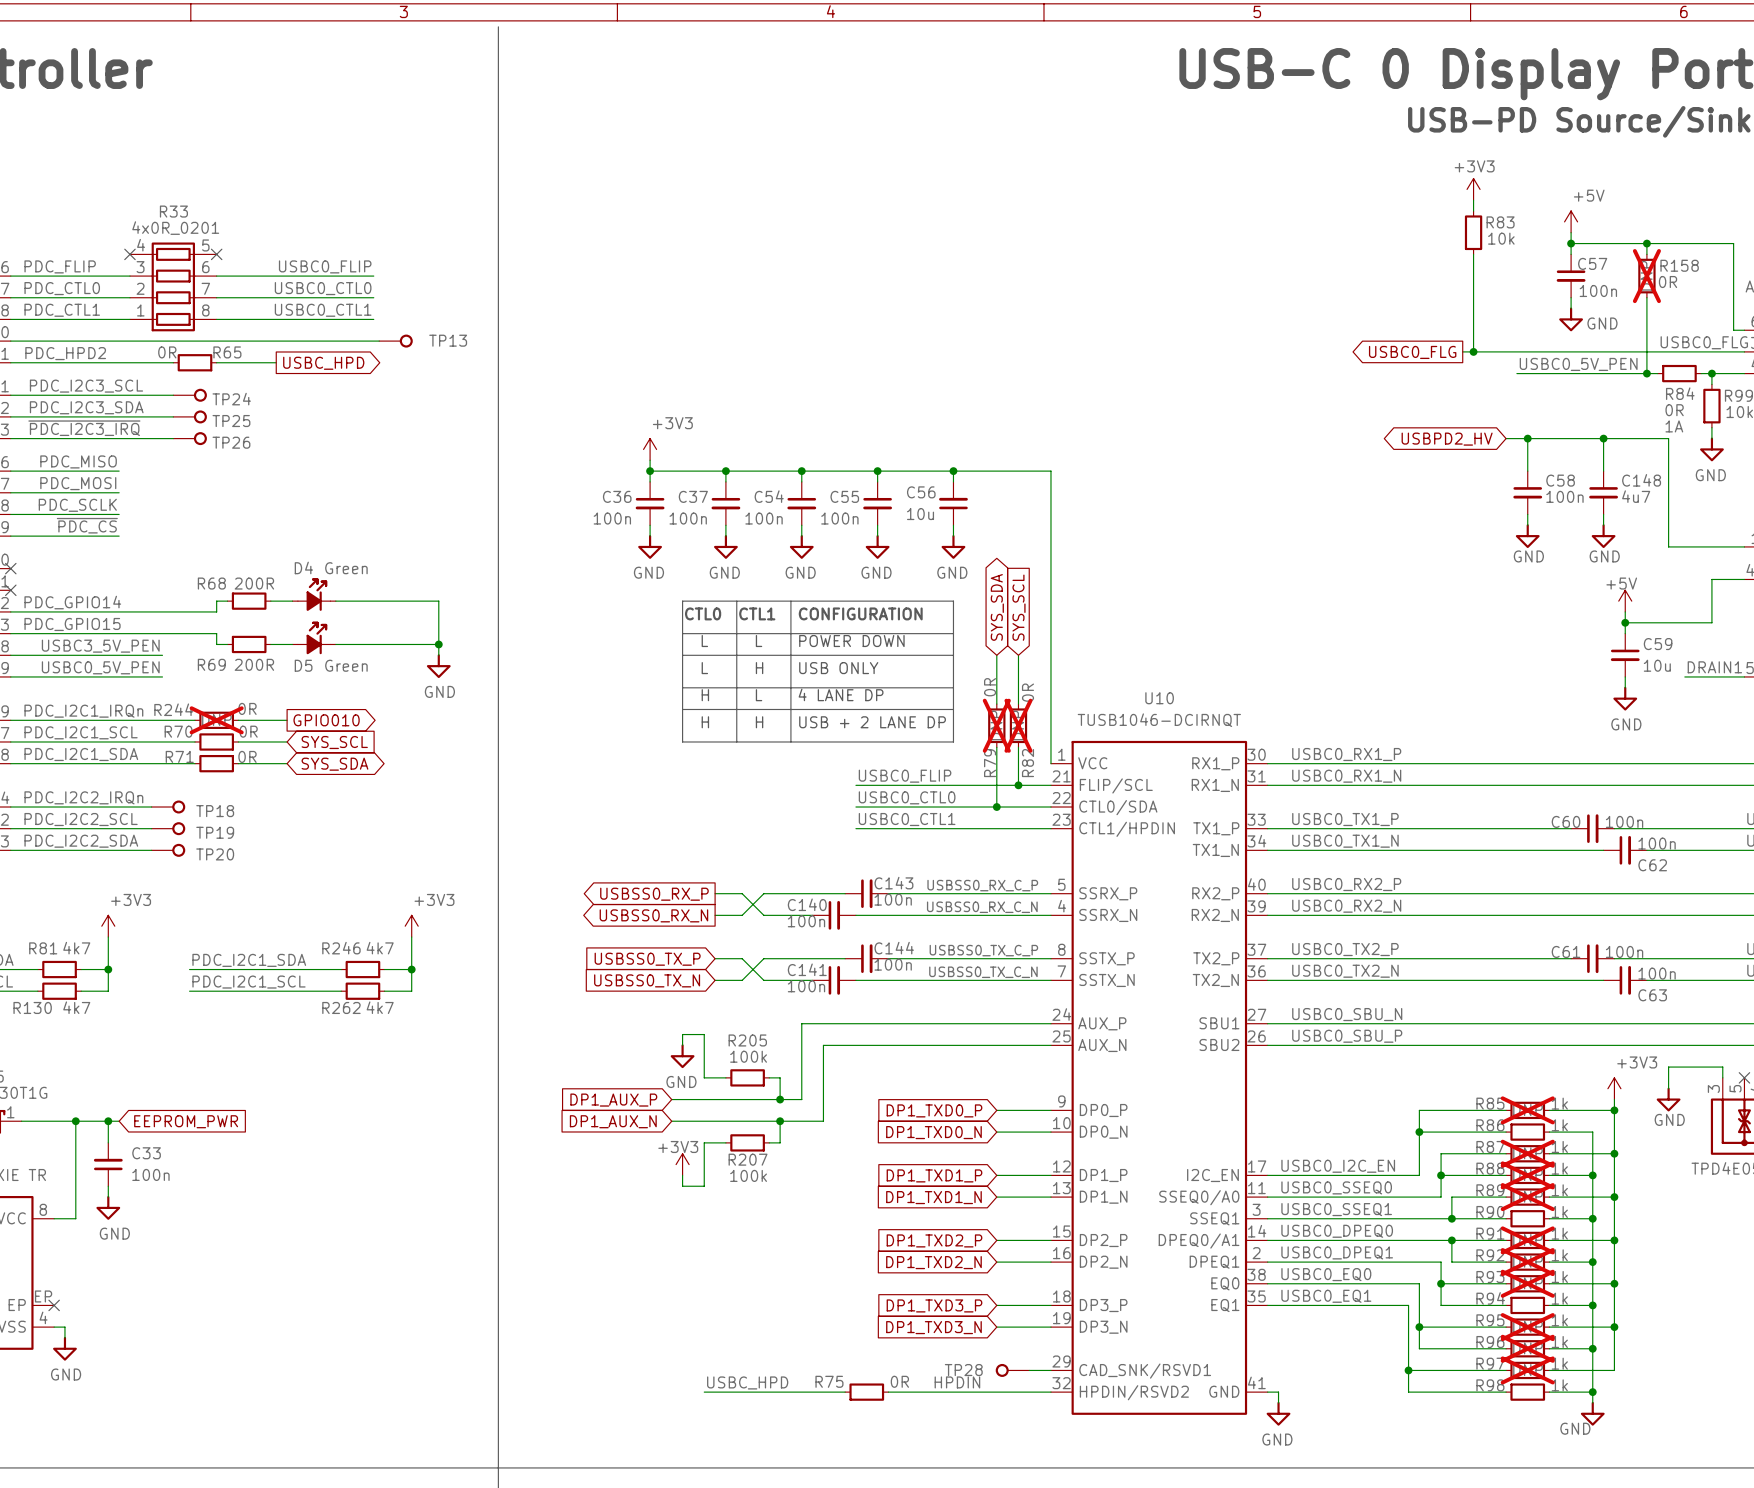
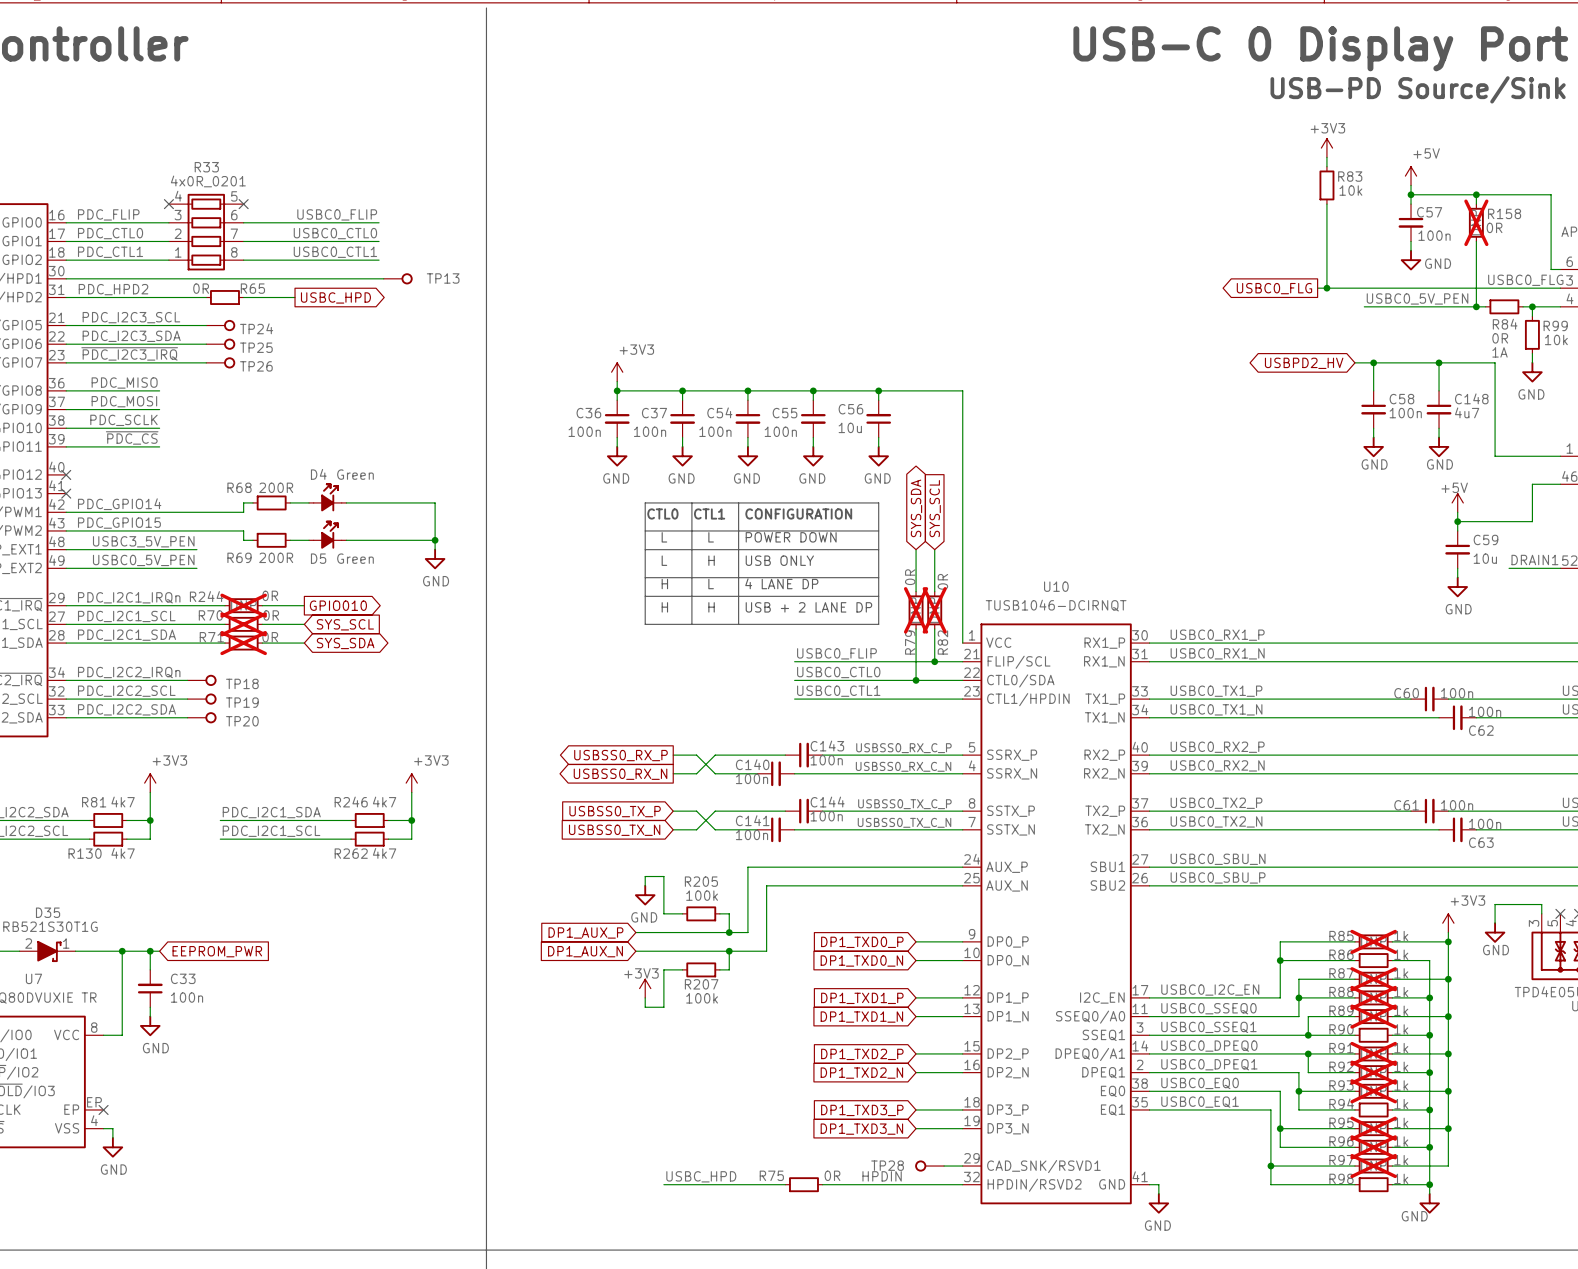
R70 do-not-place cross: none -> (243, 624)
R71 do-not-place cross: none -> (243, 643)

